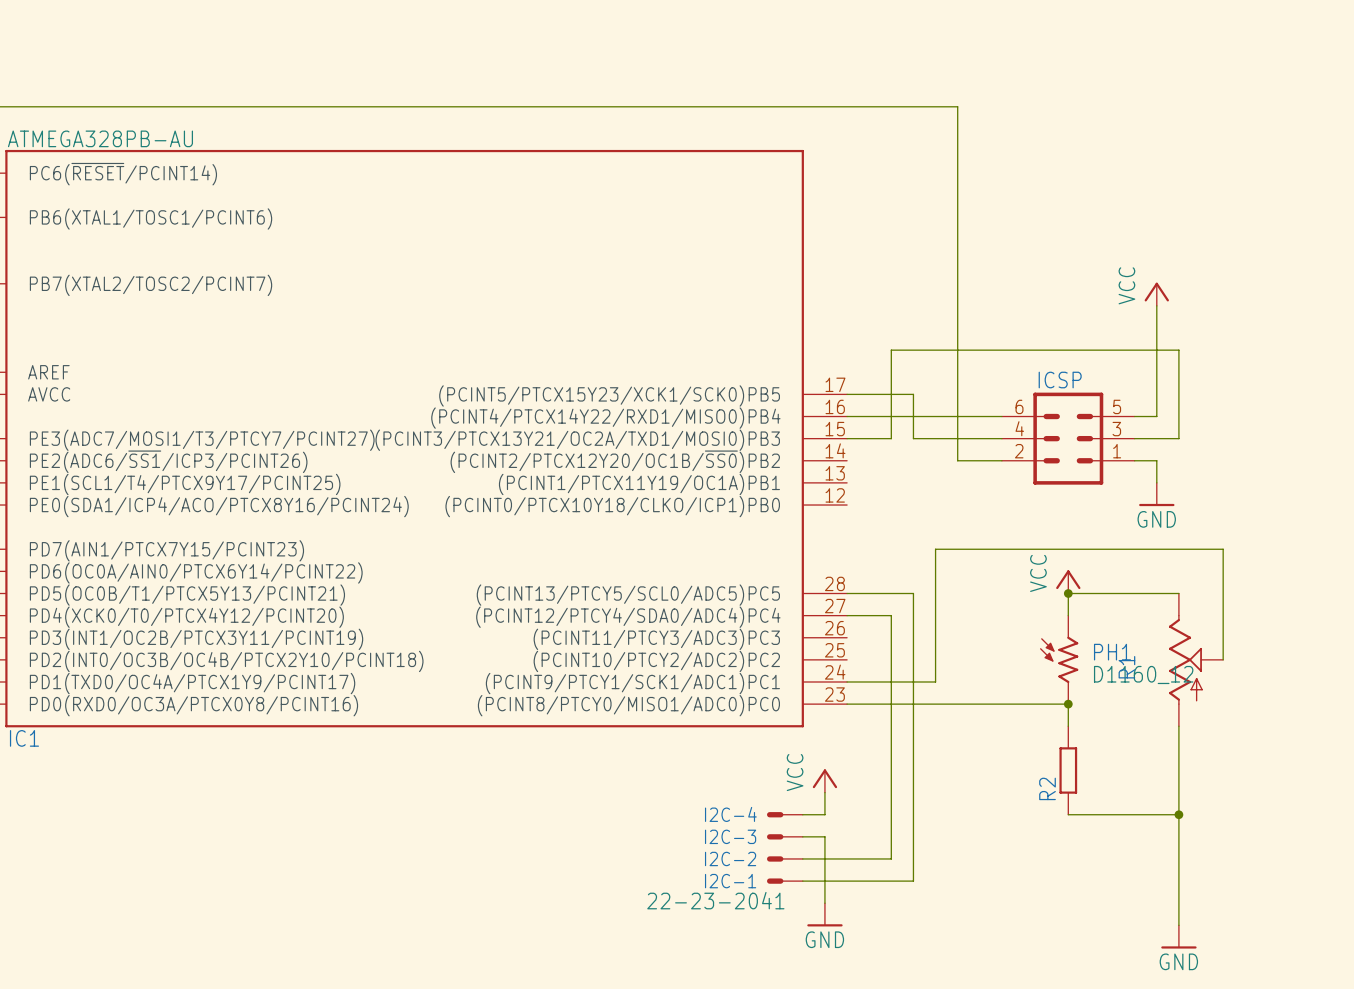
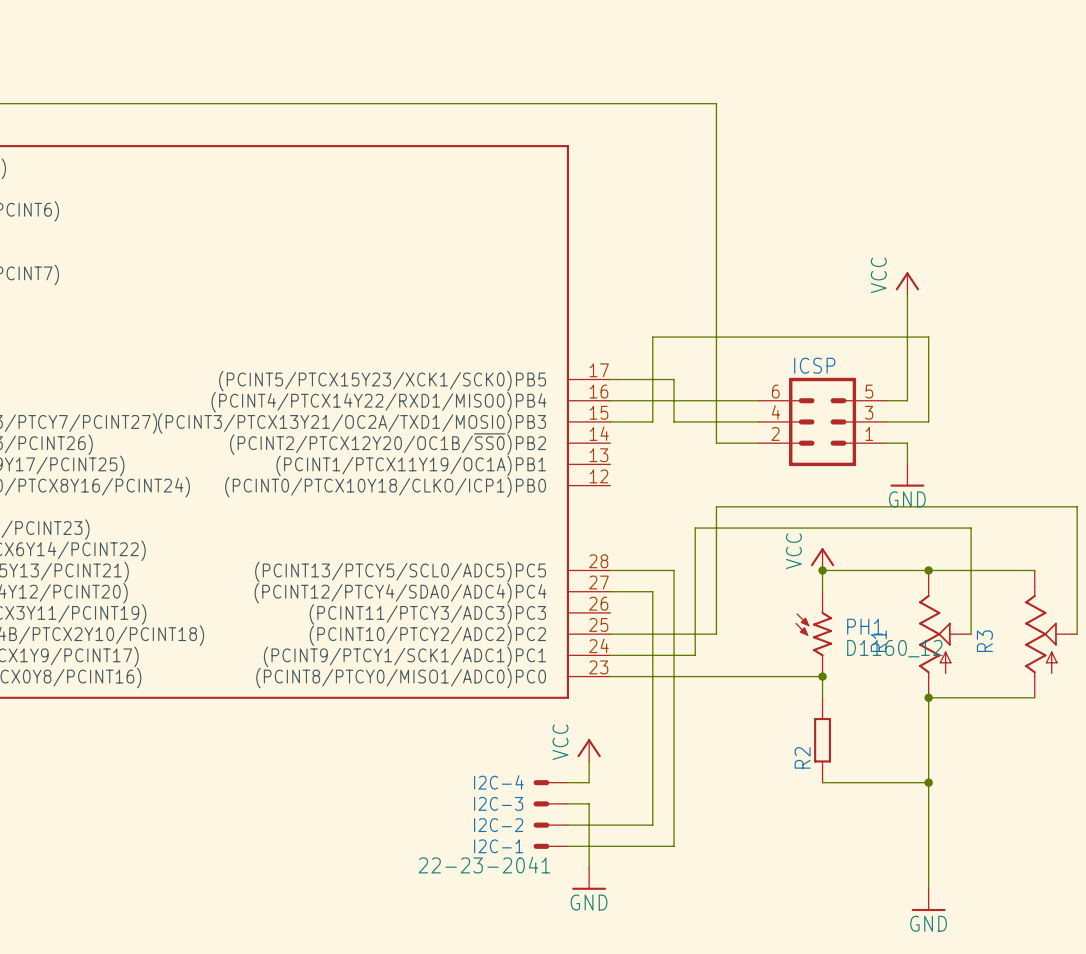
wire: none -> (928, 570) (1034, 570)
junction: none -> (928, 570)
wire: none -> (610, 634) (716, 634) (716, 506) (1077, 506) (1077, 634)
R3: none -> (1051, 634)
wire: none -> (928, 697) (1034, 697)
junction: none -> (928, 697)

